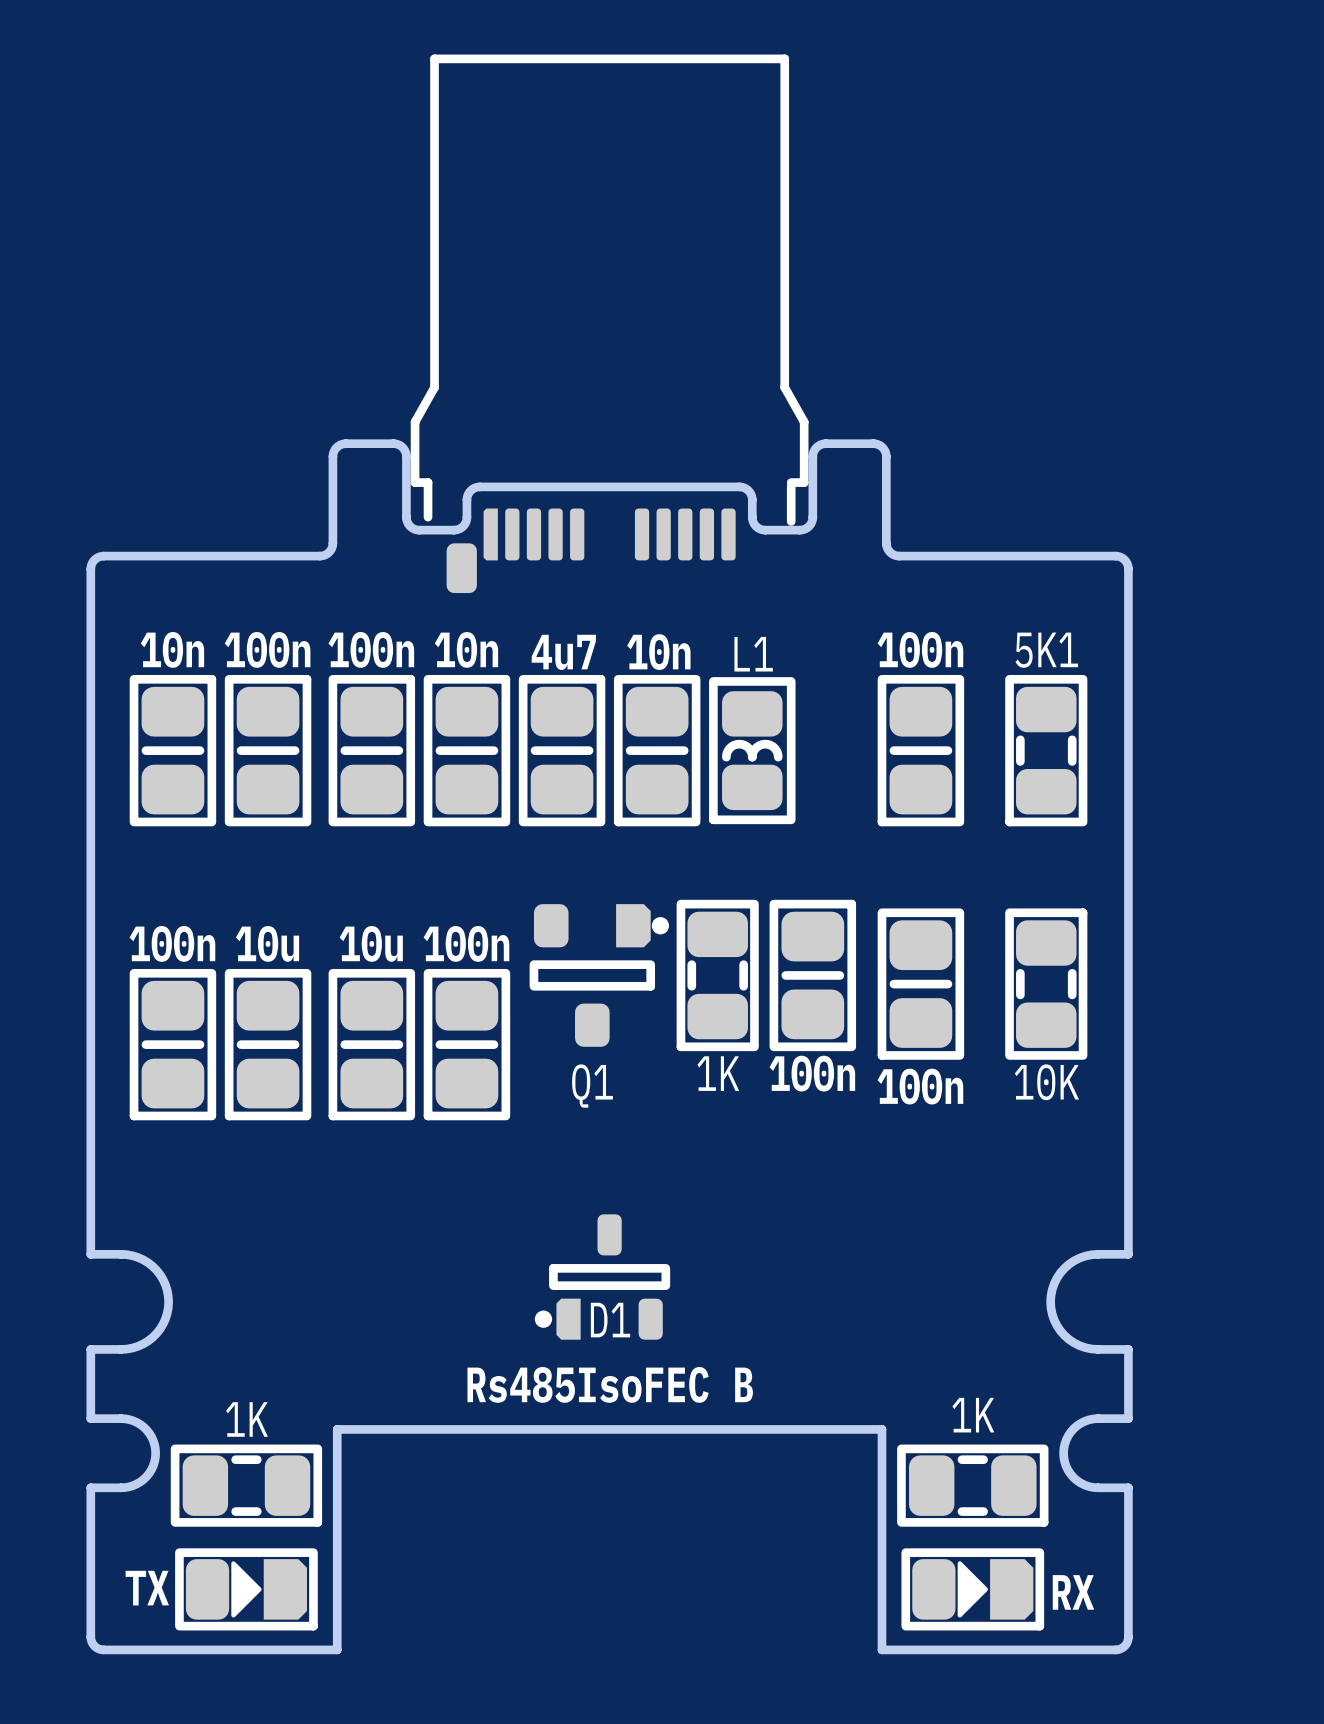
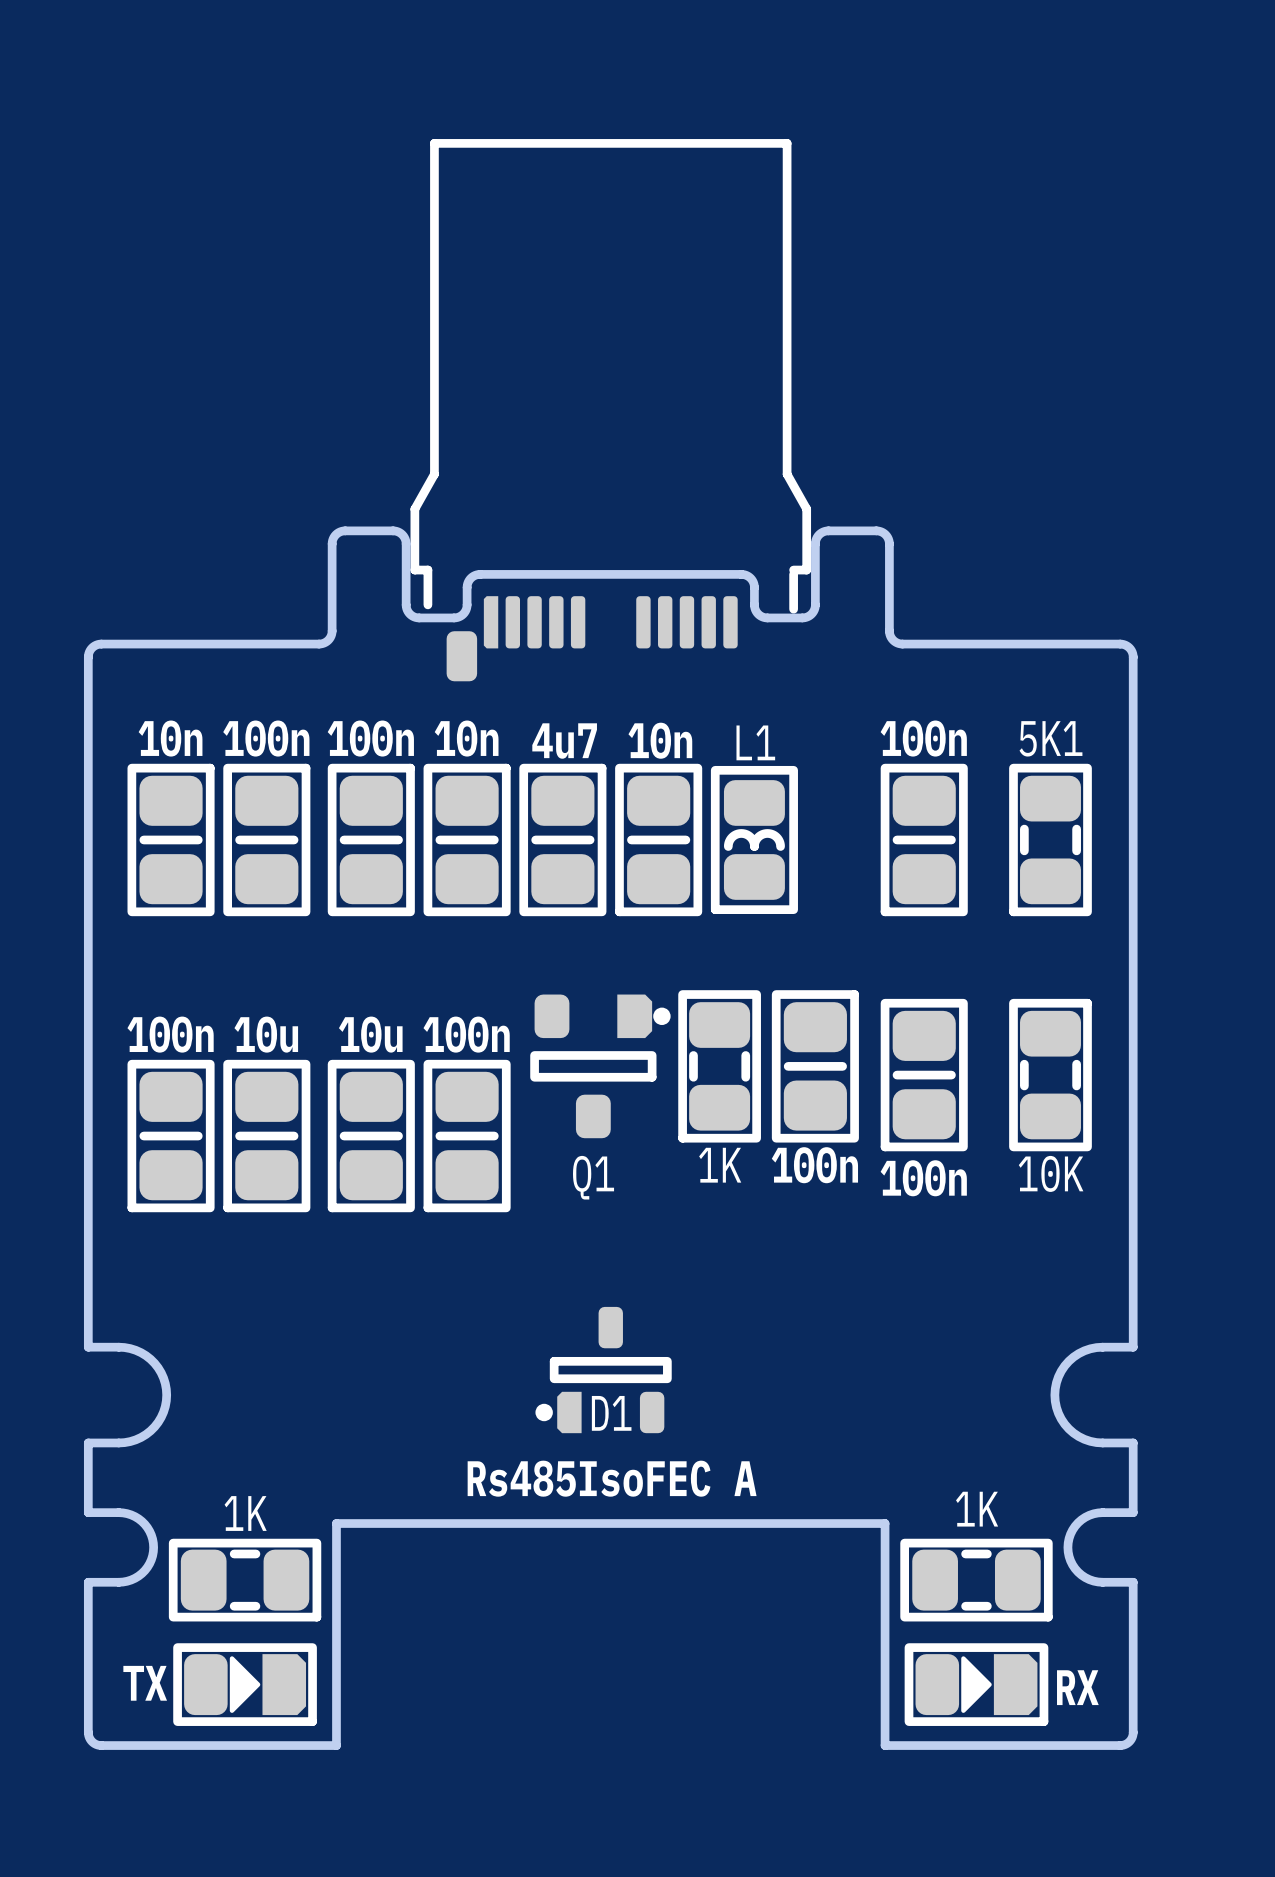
text: Rs485IsoFEC B (610, 1384) -> Rs485IsoFEC A (612, 1478)

